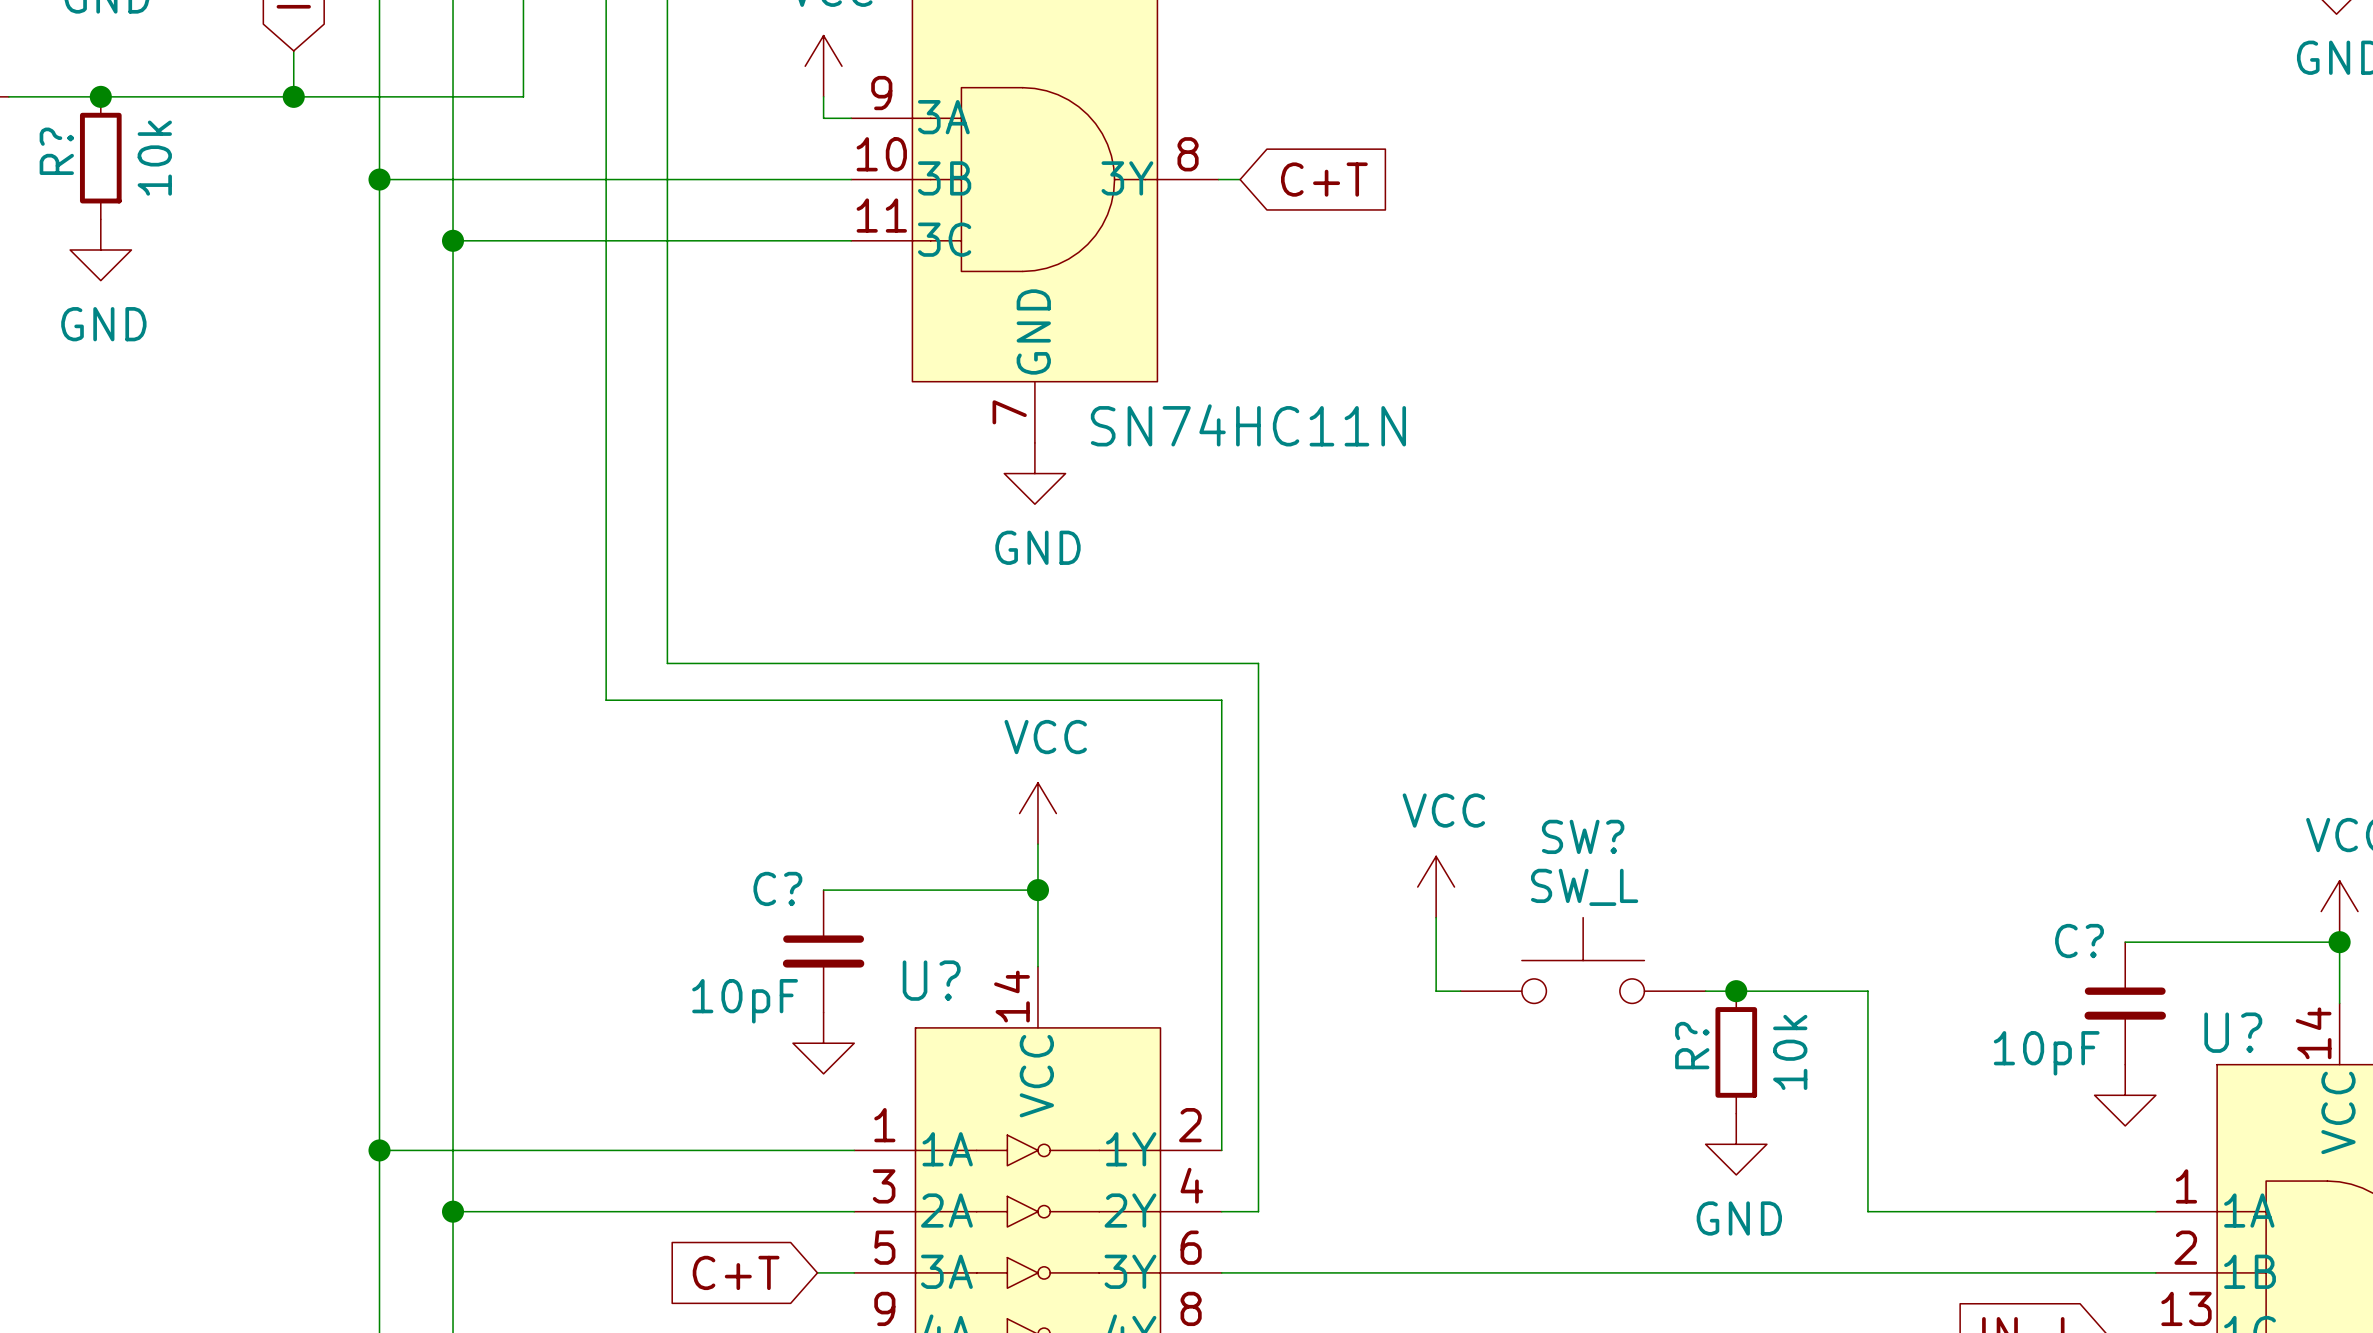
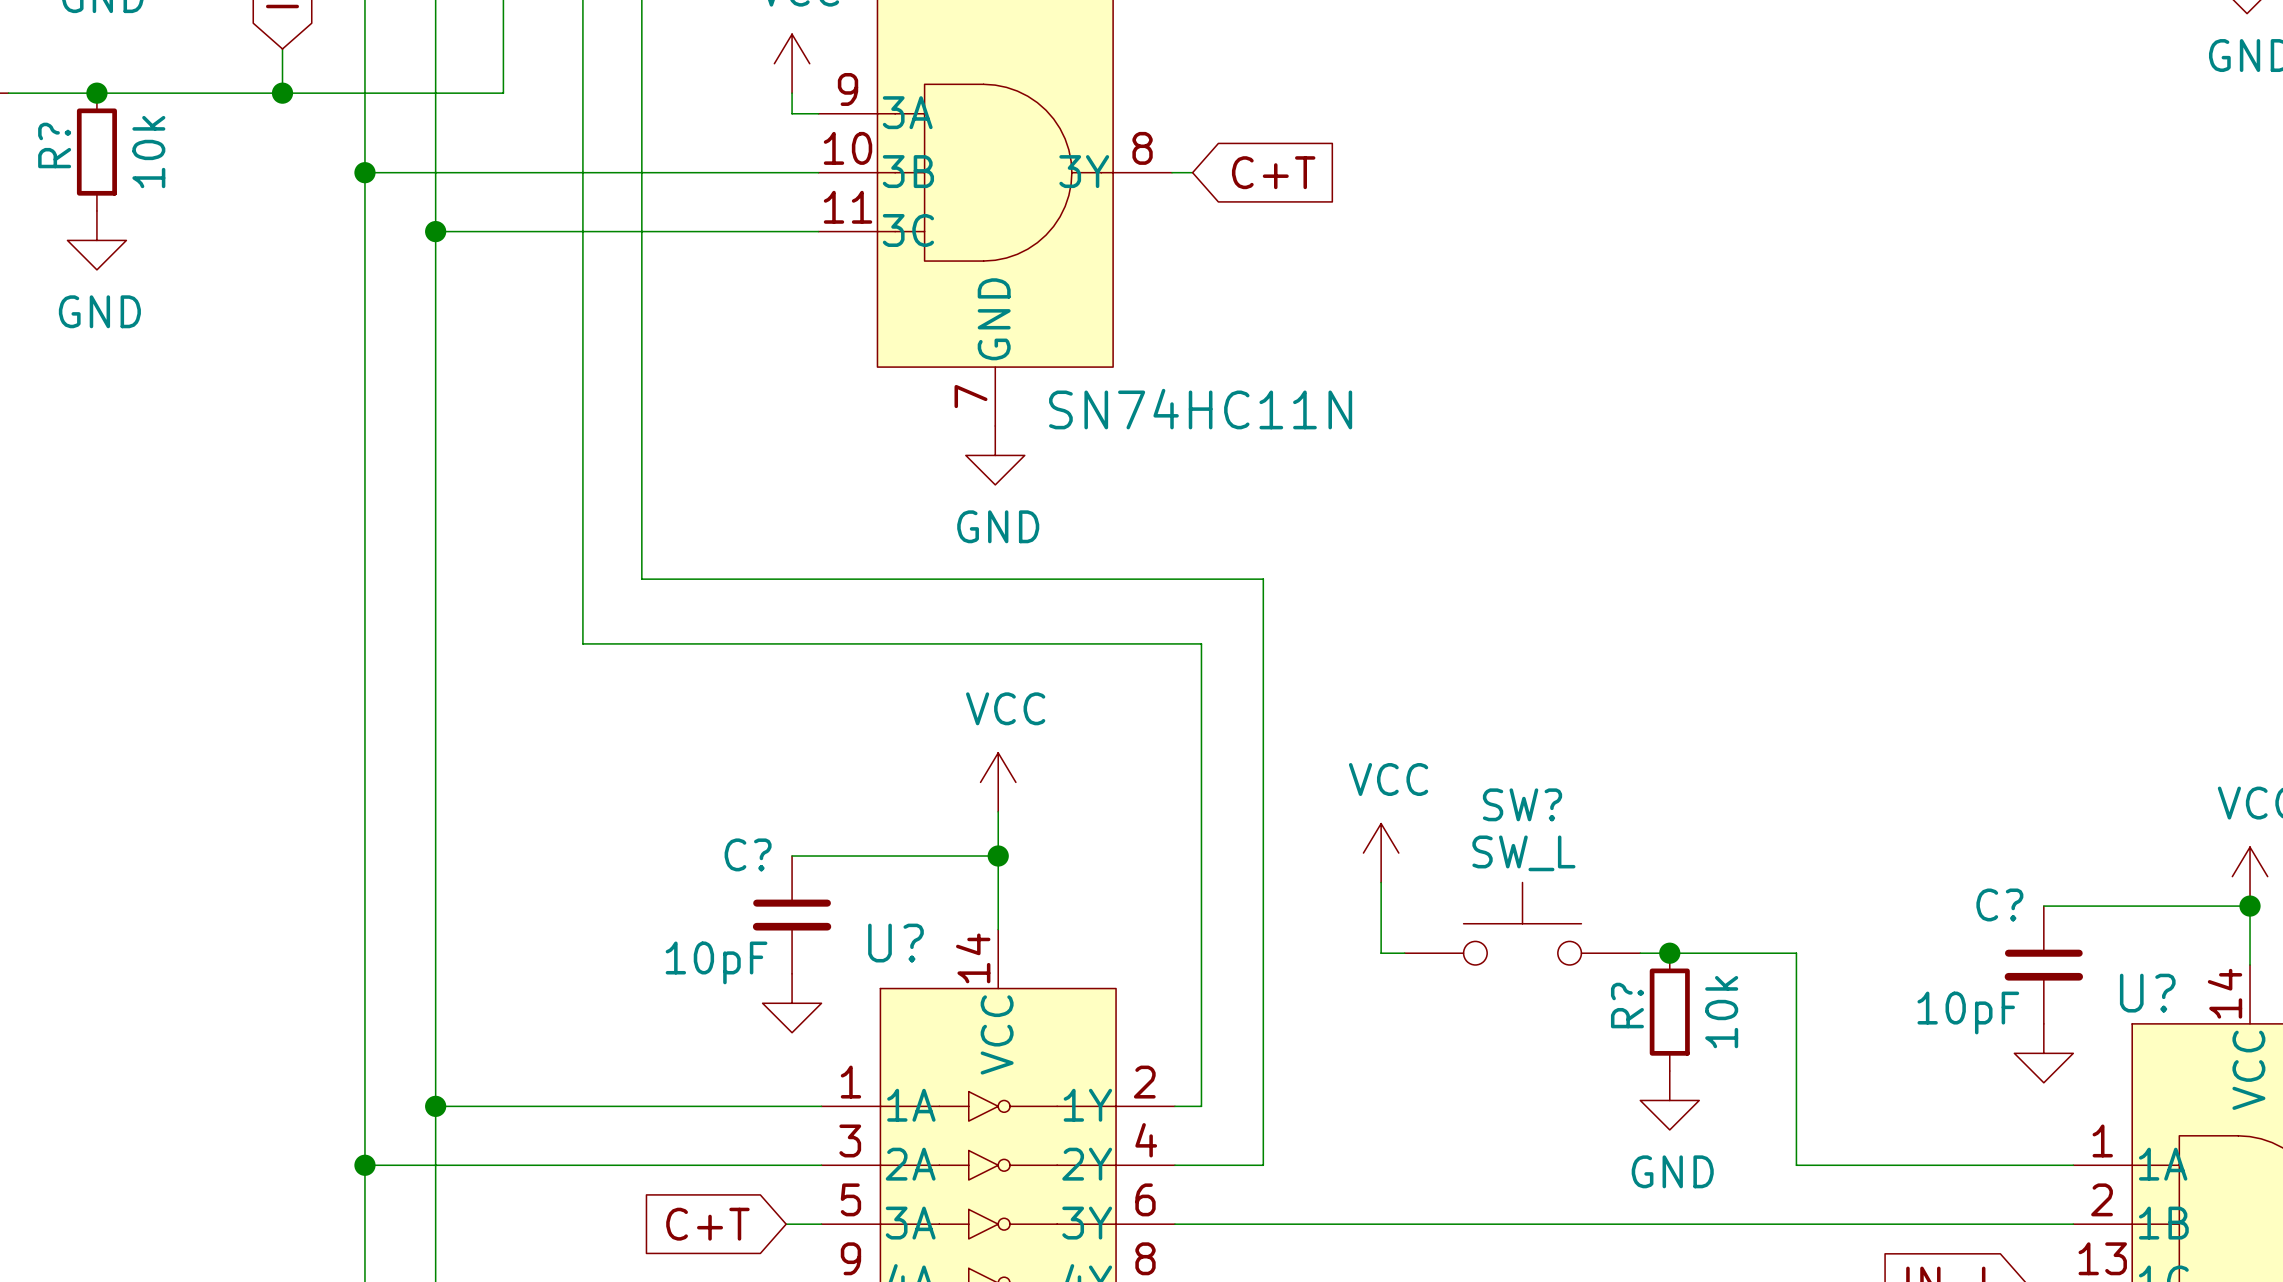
wire: (667, 602) (667, 663) (1258, 663) (1258, 1211) -> (641, 579) (1263, 579) (1263, 1165) (1210, 1165)
wire: (606, 669) (606, 700) (1221, 700) (1221, 1150) -> (582, 643) (1201, 643) (1201, 1106) (1174, 1106)
wire: (379, 1150) (453, 1150) -> (364, 1165) (435, 1165)
junction: (379, 1150) -> none
junction: none -> (435, 1106)
junction: none -> (364, 1165)
junction: (453, 1211) -> none

